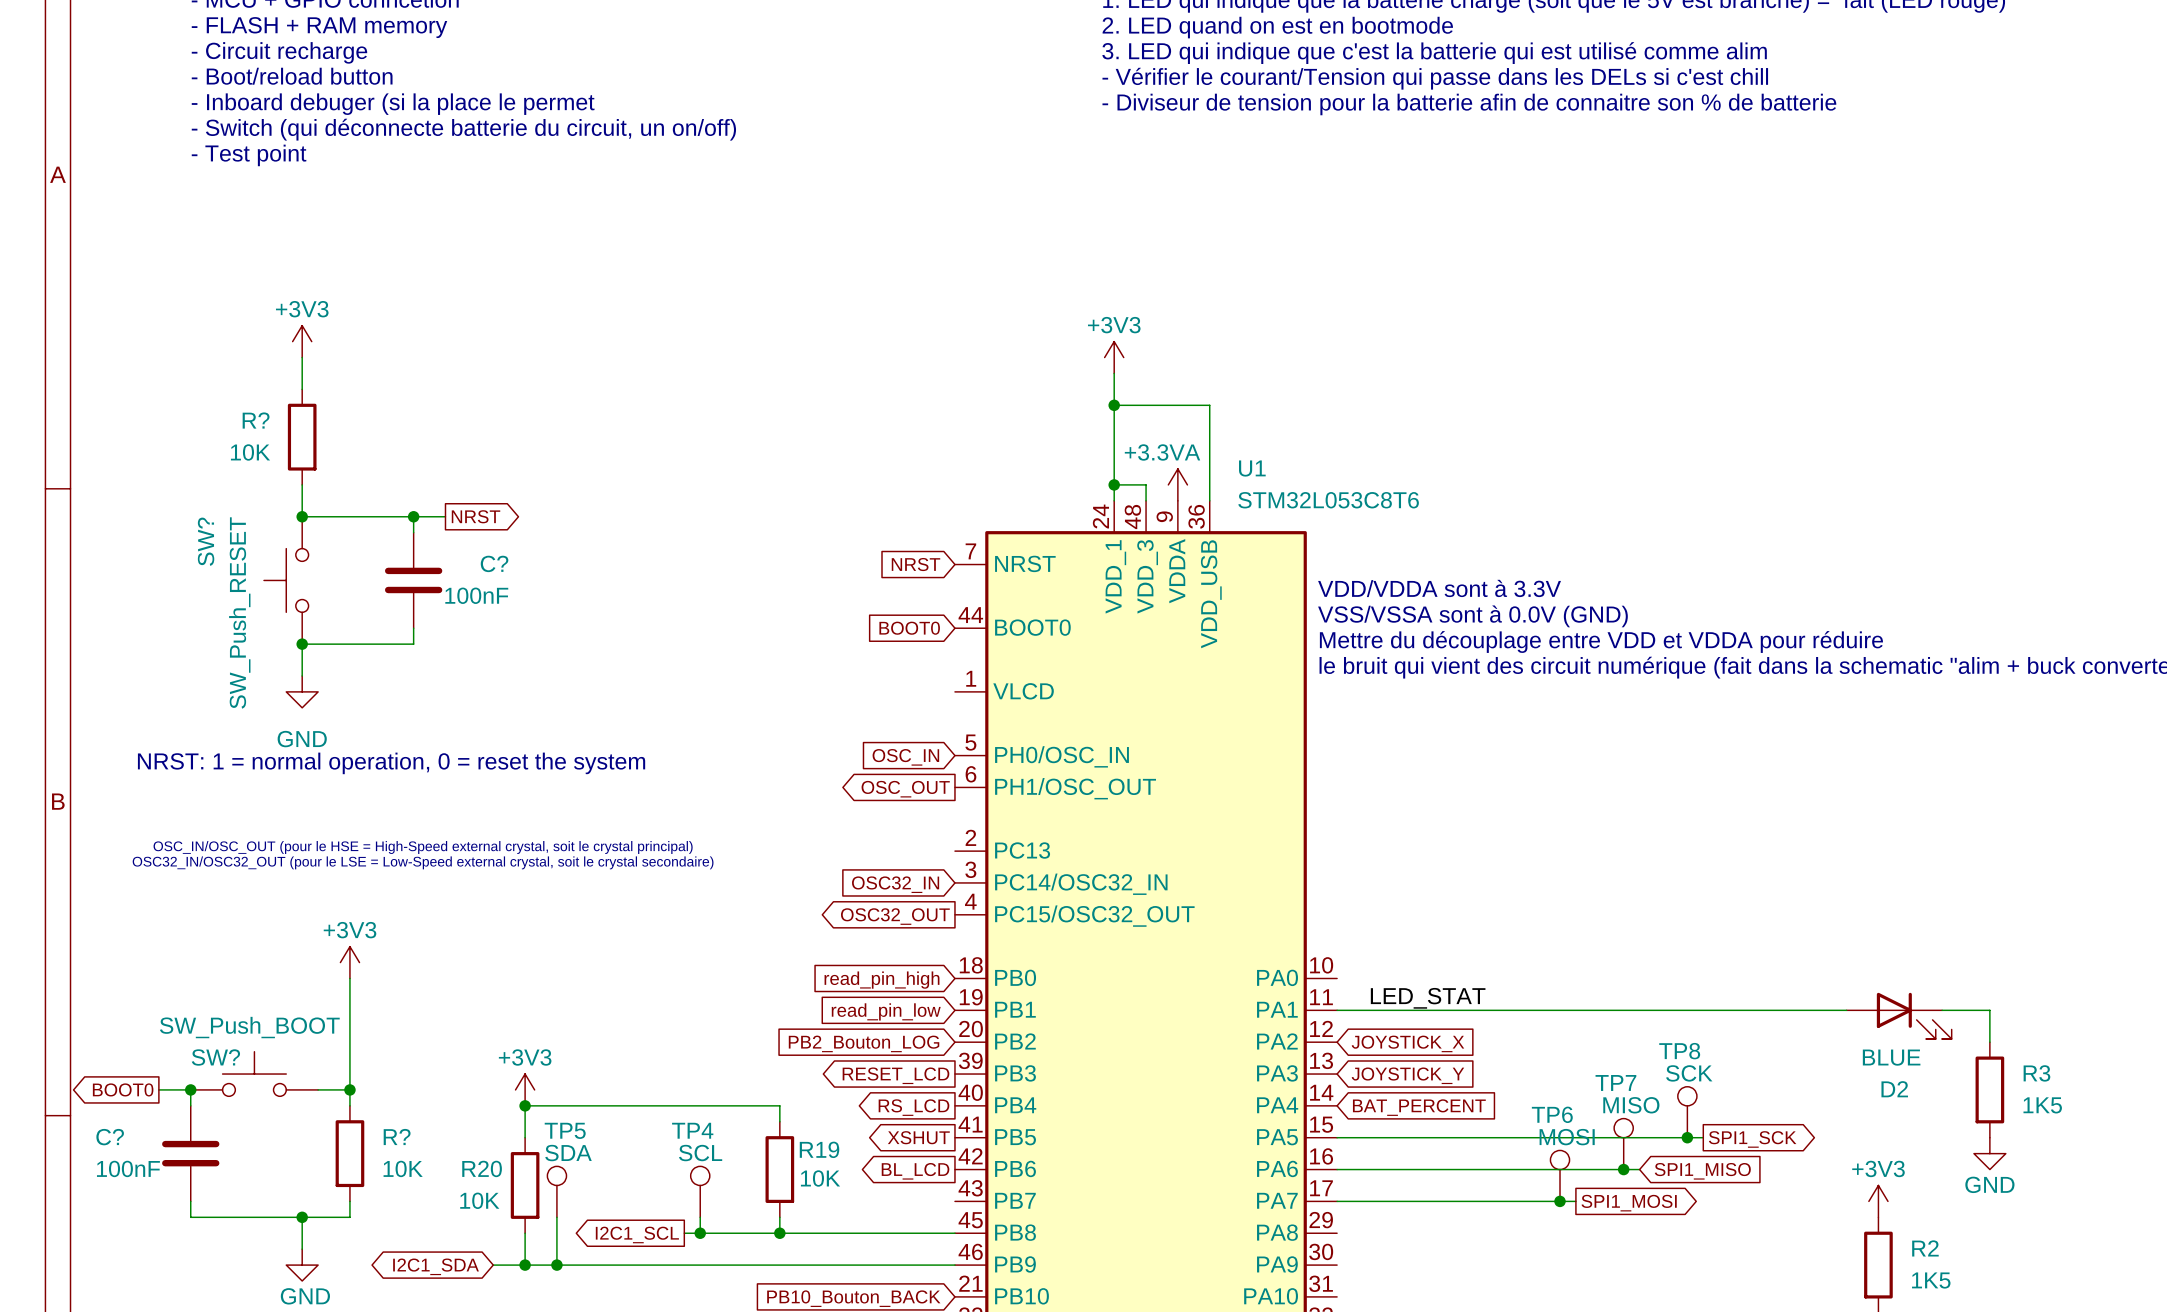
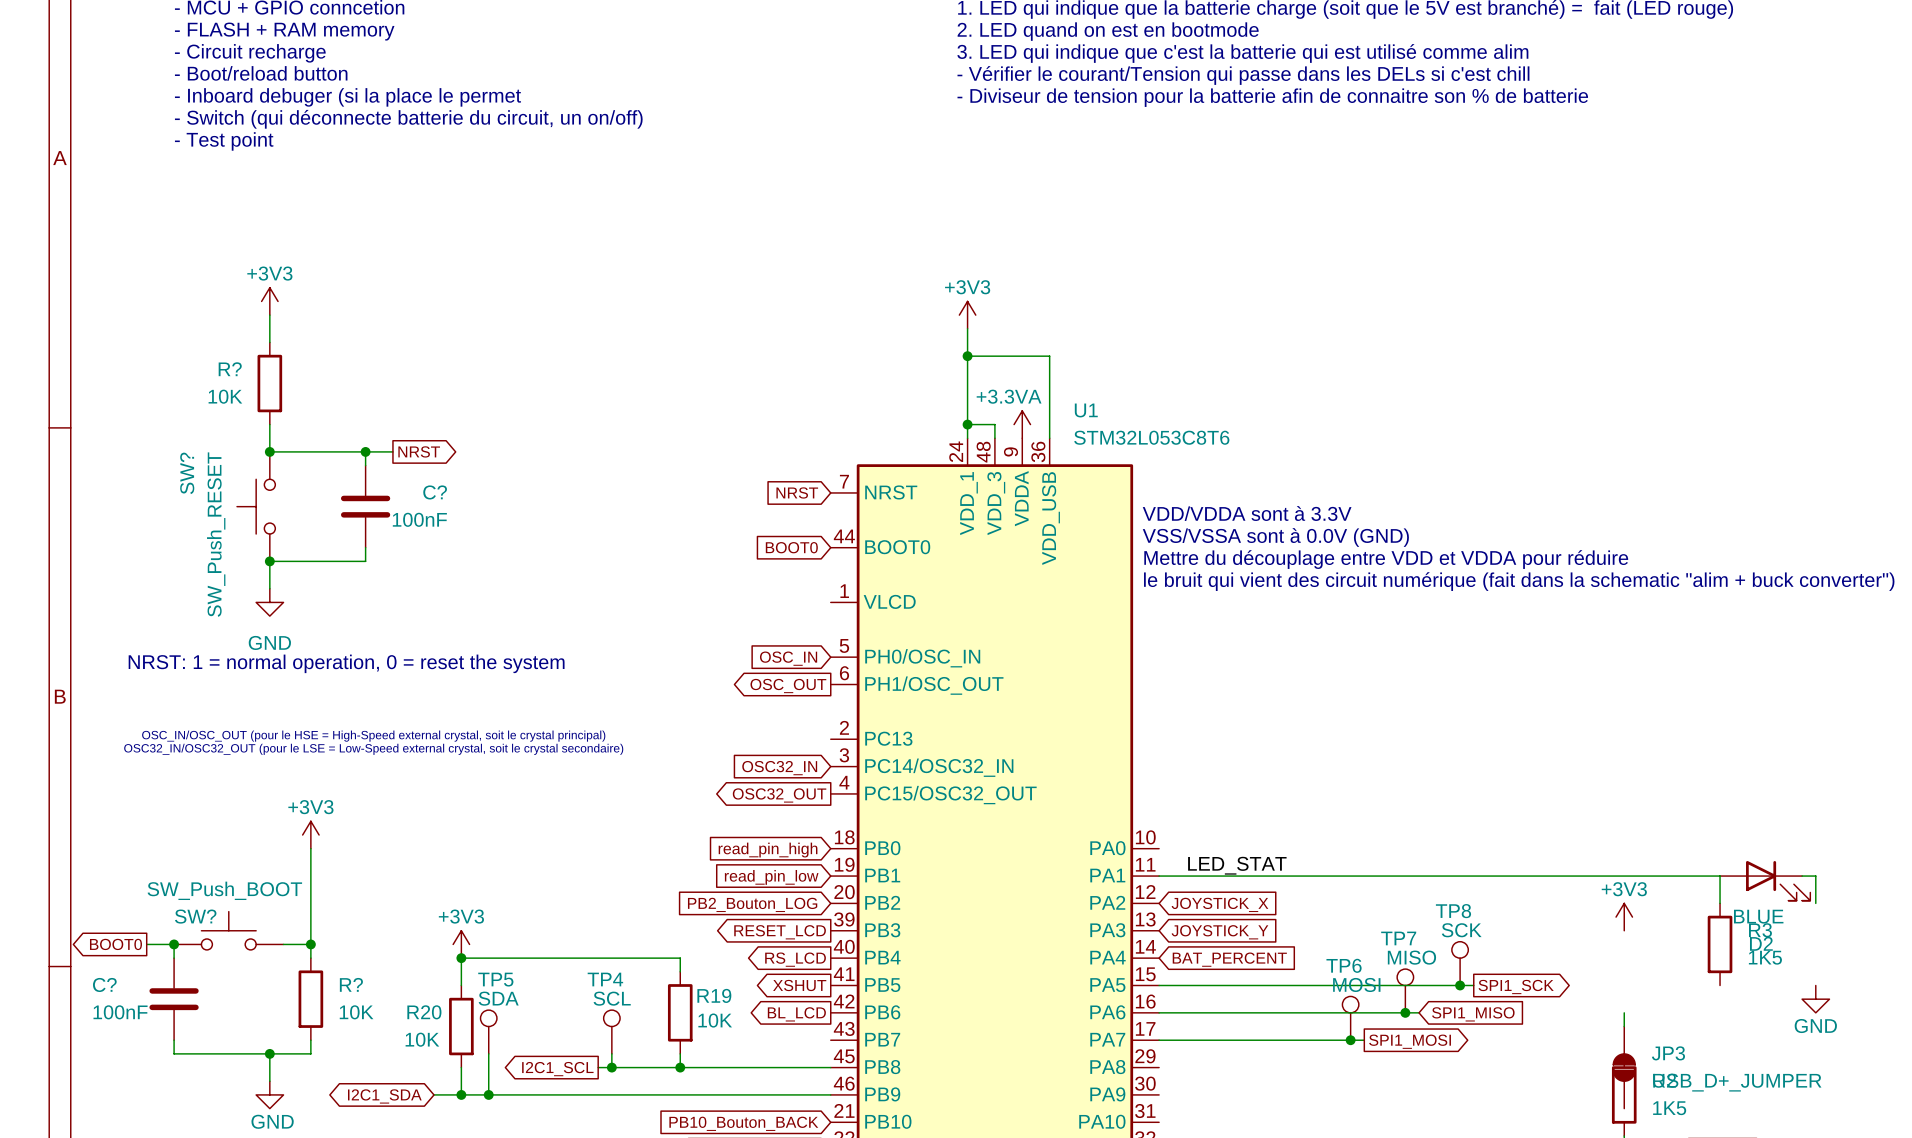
wire: none -> (1802, 876) (1815, 876) (1815, 903)
D2 position: (1899, 1015) -> (1765, 880)
power symbol position: GND (1989, 1153) -> GND (1815, 999)
wire: none -> (1624, 1012) (1624, 1026)
power symbol position: +3V3 (1878, 1201) -> +3V3 (1624, 917)
JP3: none -> USB_D+_JUMPER (1624, 1067)

